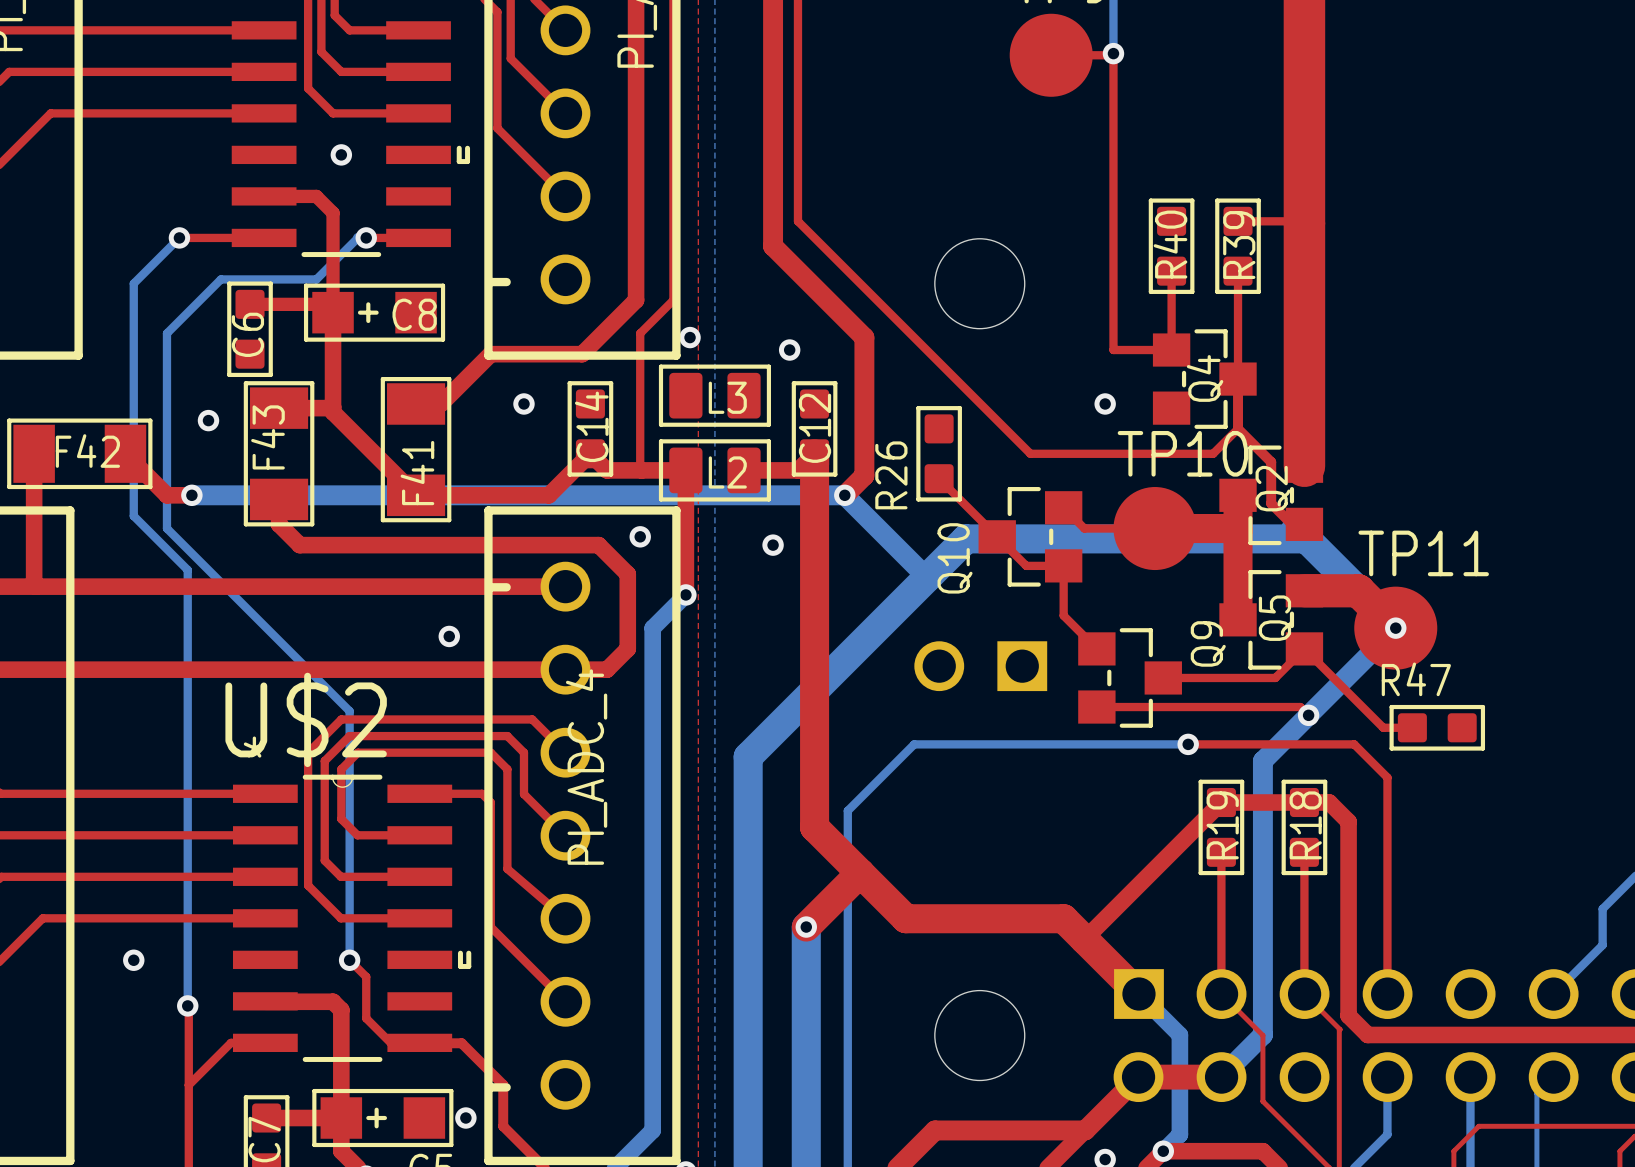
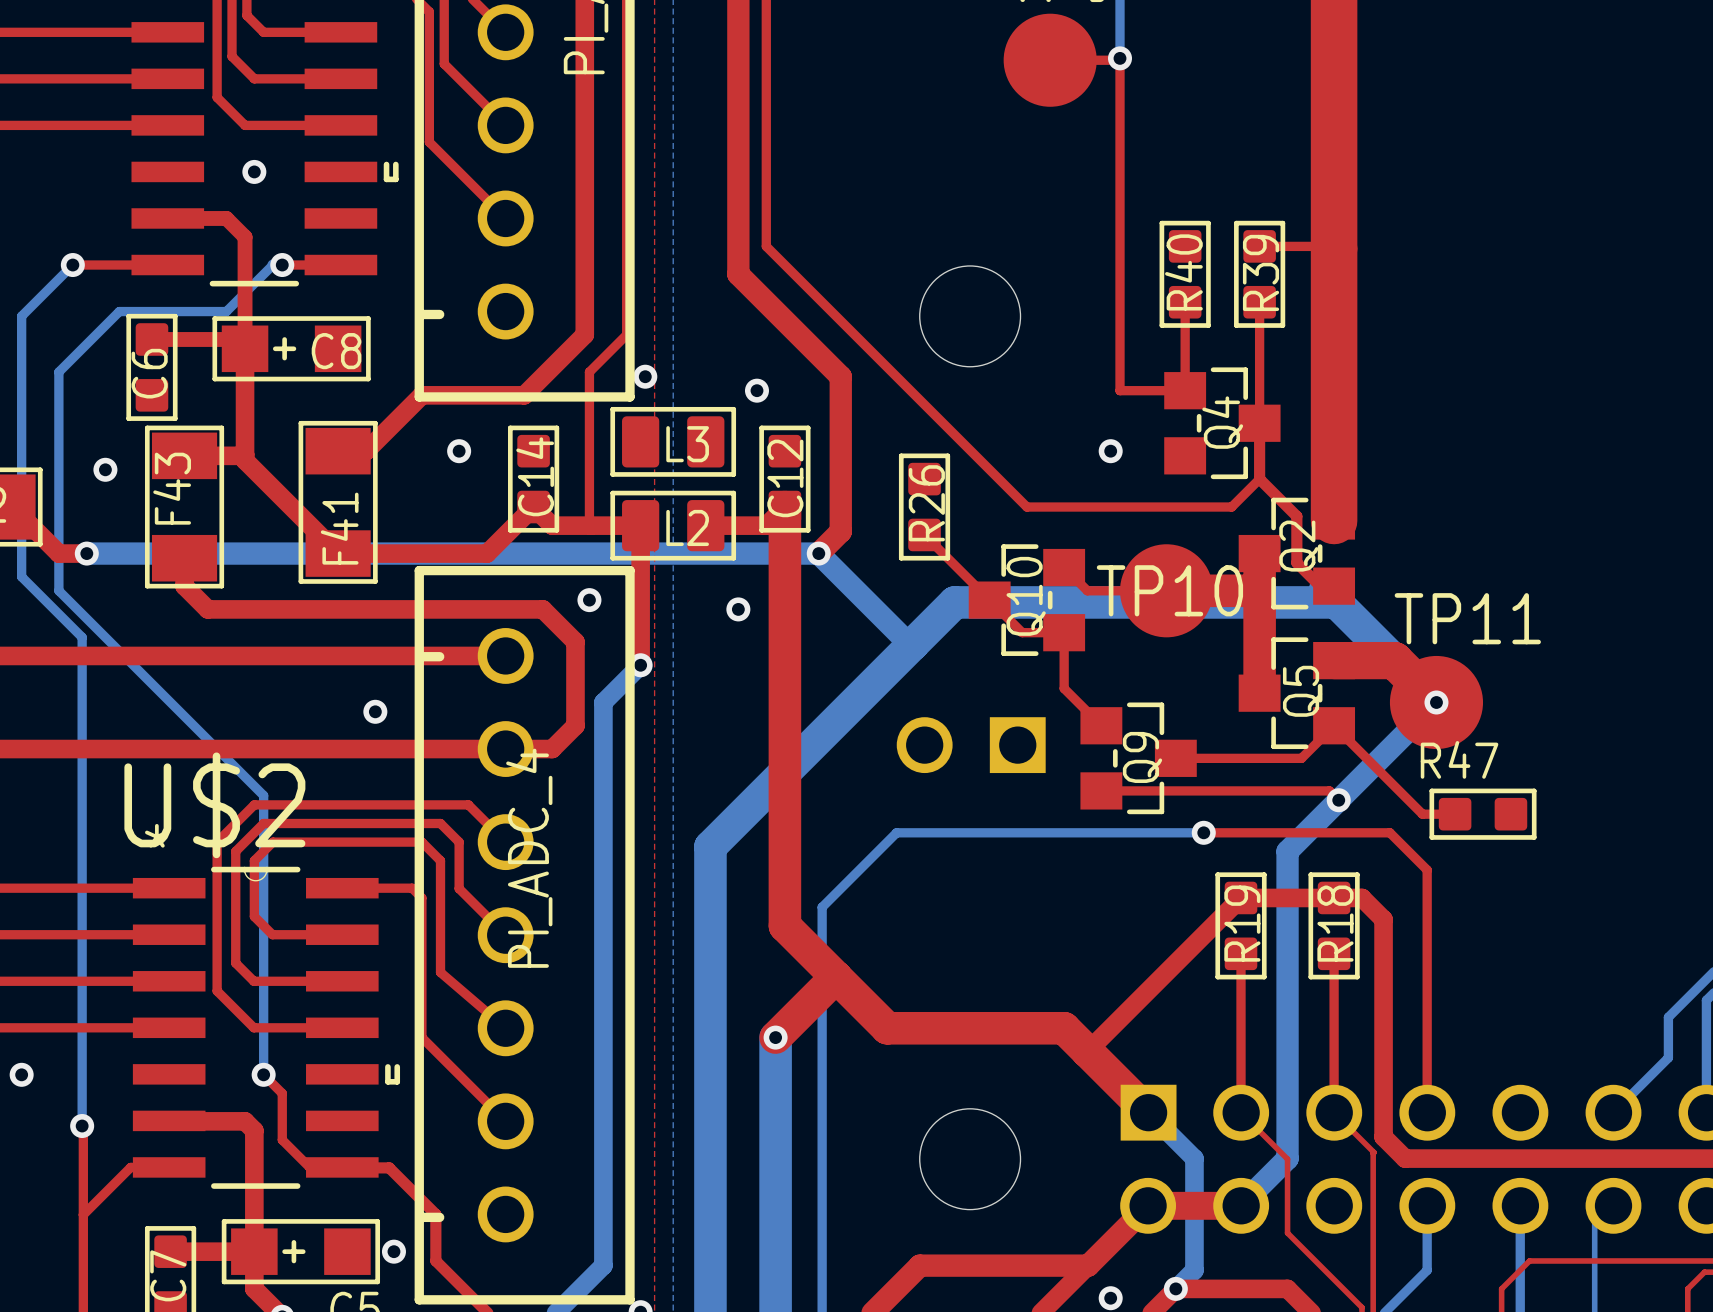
TP10 name position: TP10 (1182, 453) -> TP10 (1169, 590)
R26 name position: R26 (891, 475) -> R26 (926, 503)
Q10 name position: Q10 (955, 558) -> Q10 (1026, 596)
Q9 name position: Q9 (1208, 643) -> Q9 (1142, 757)

